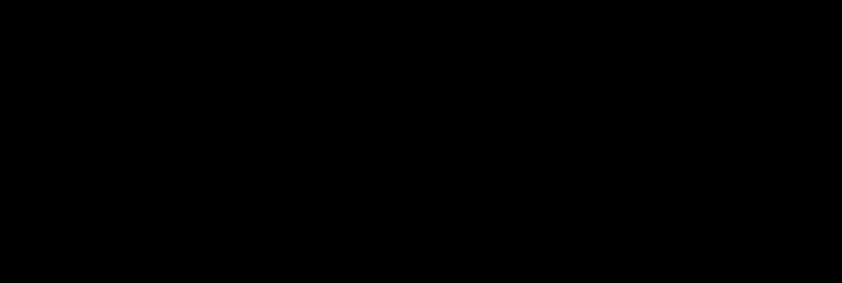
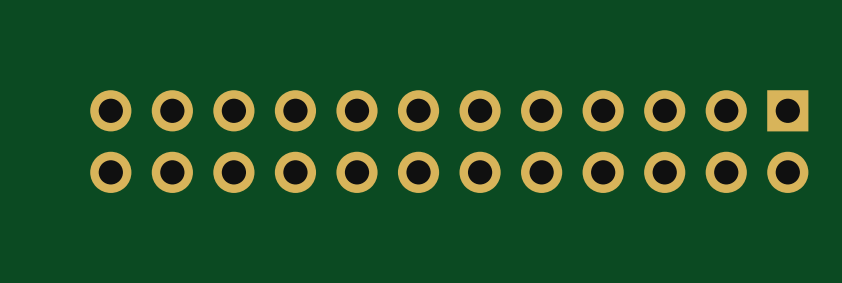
part: none -> (449, 141)

